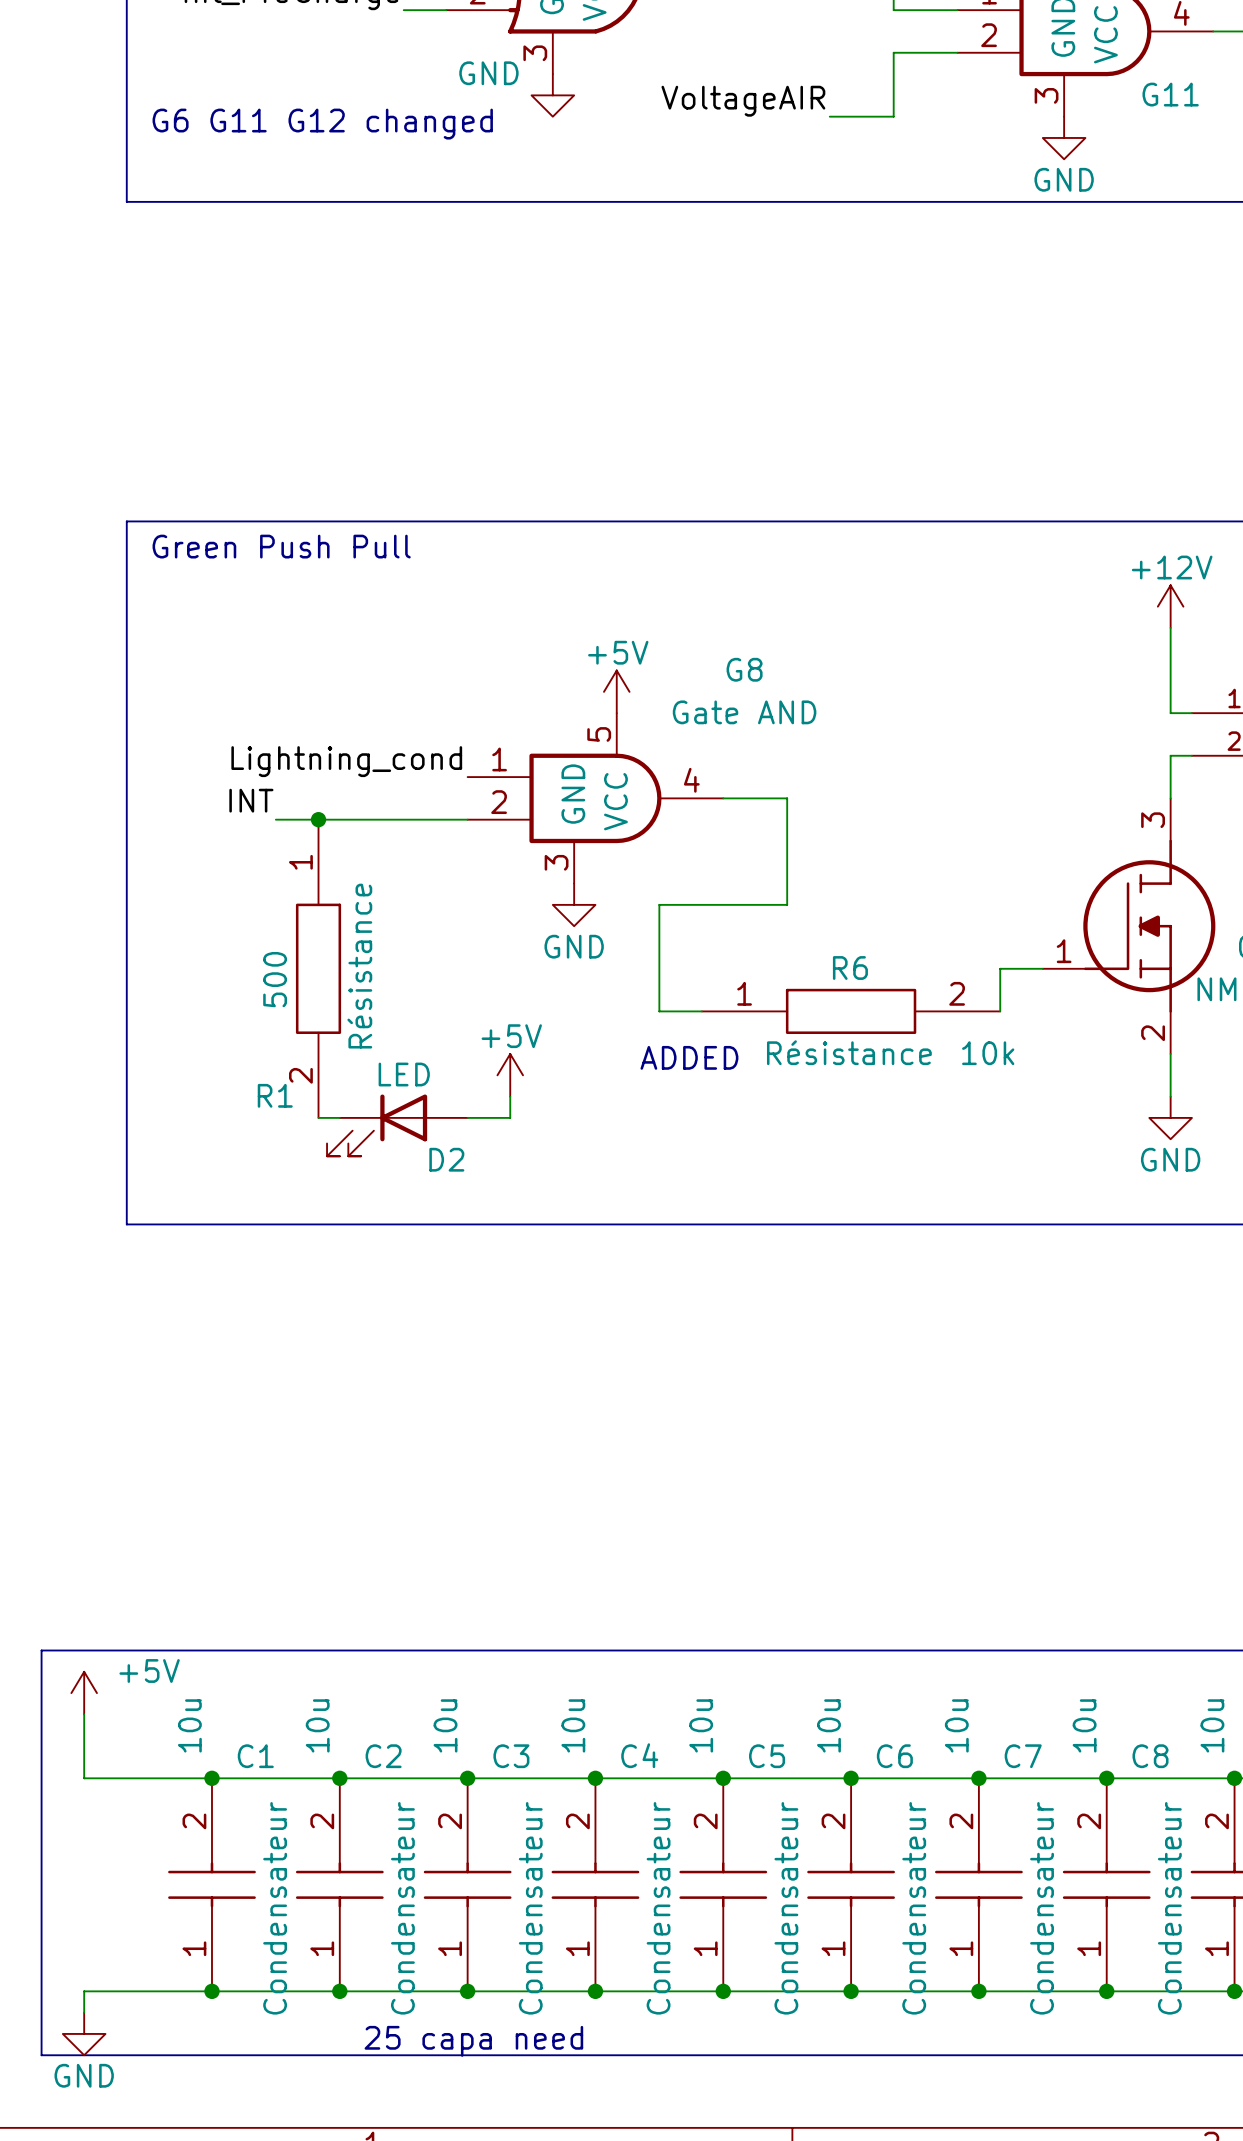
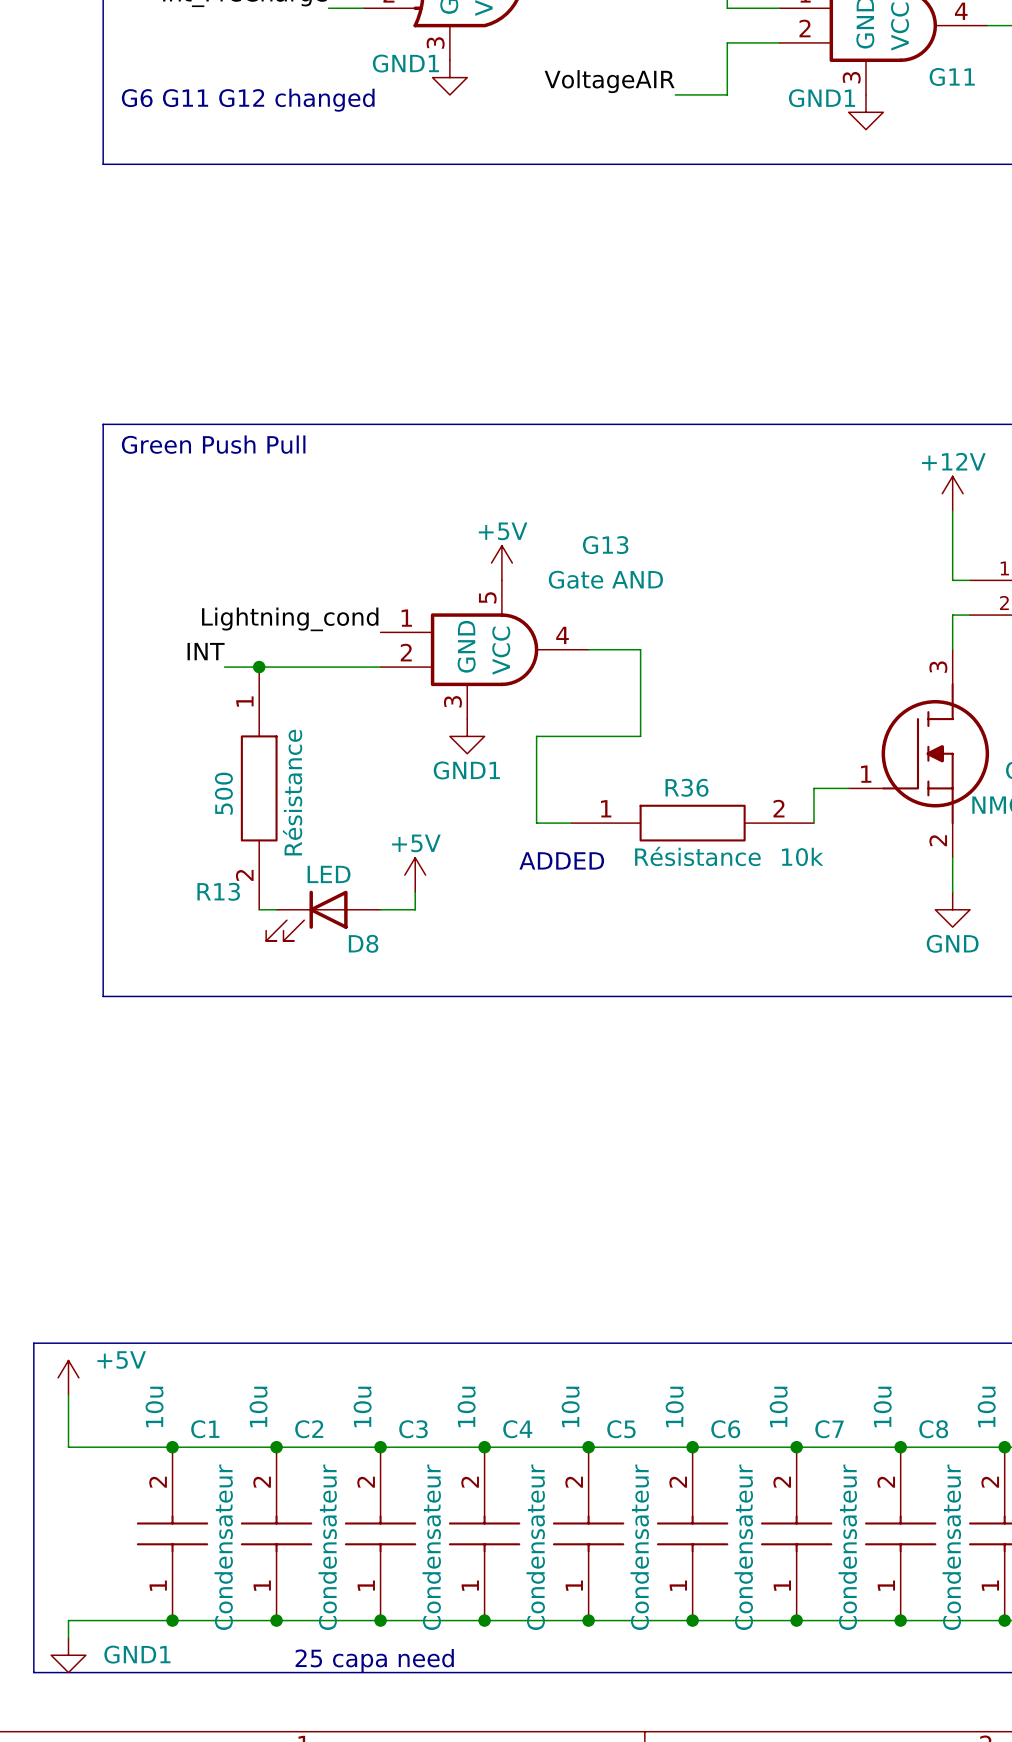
power symbol: GND (552, 95) -> GND1 (449, 77)
power symbol: GND (1064, 137) -> GND1 (865, 112)
G8 name: G8 (744, 669) -> G13 (605, 545)
power symbol: GND (574, 904) -> GND1 (467, 736)
R6 name: R6 (850, 968) -> R36 (686, 787)
R1 name: R1 (275, 1095) -> R13 (218, 891)
D2 name: D2 (446, 1159) -> D8 (363, 943)
power symbol: GND (84, 2033) -> GND1 (68, 1655)

